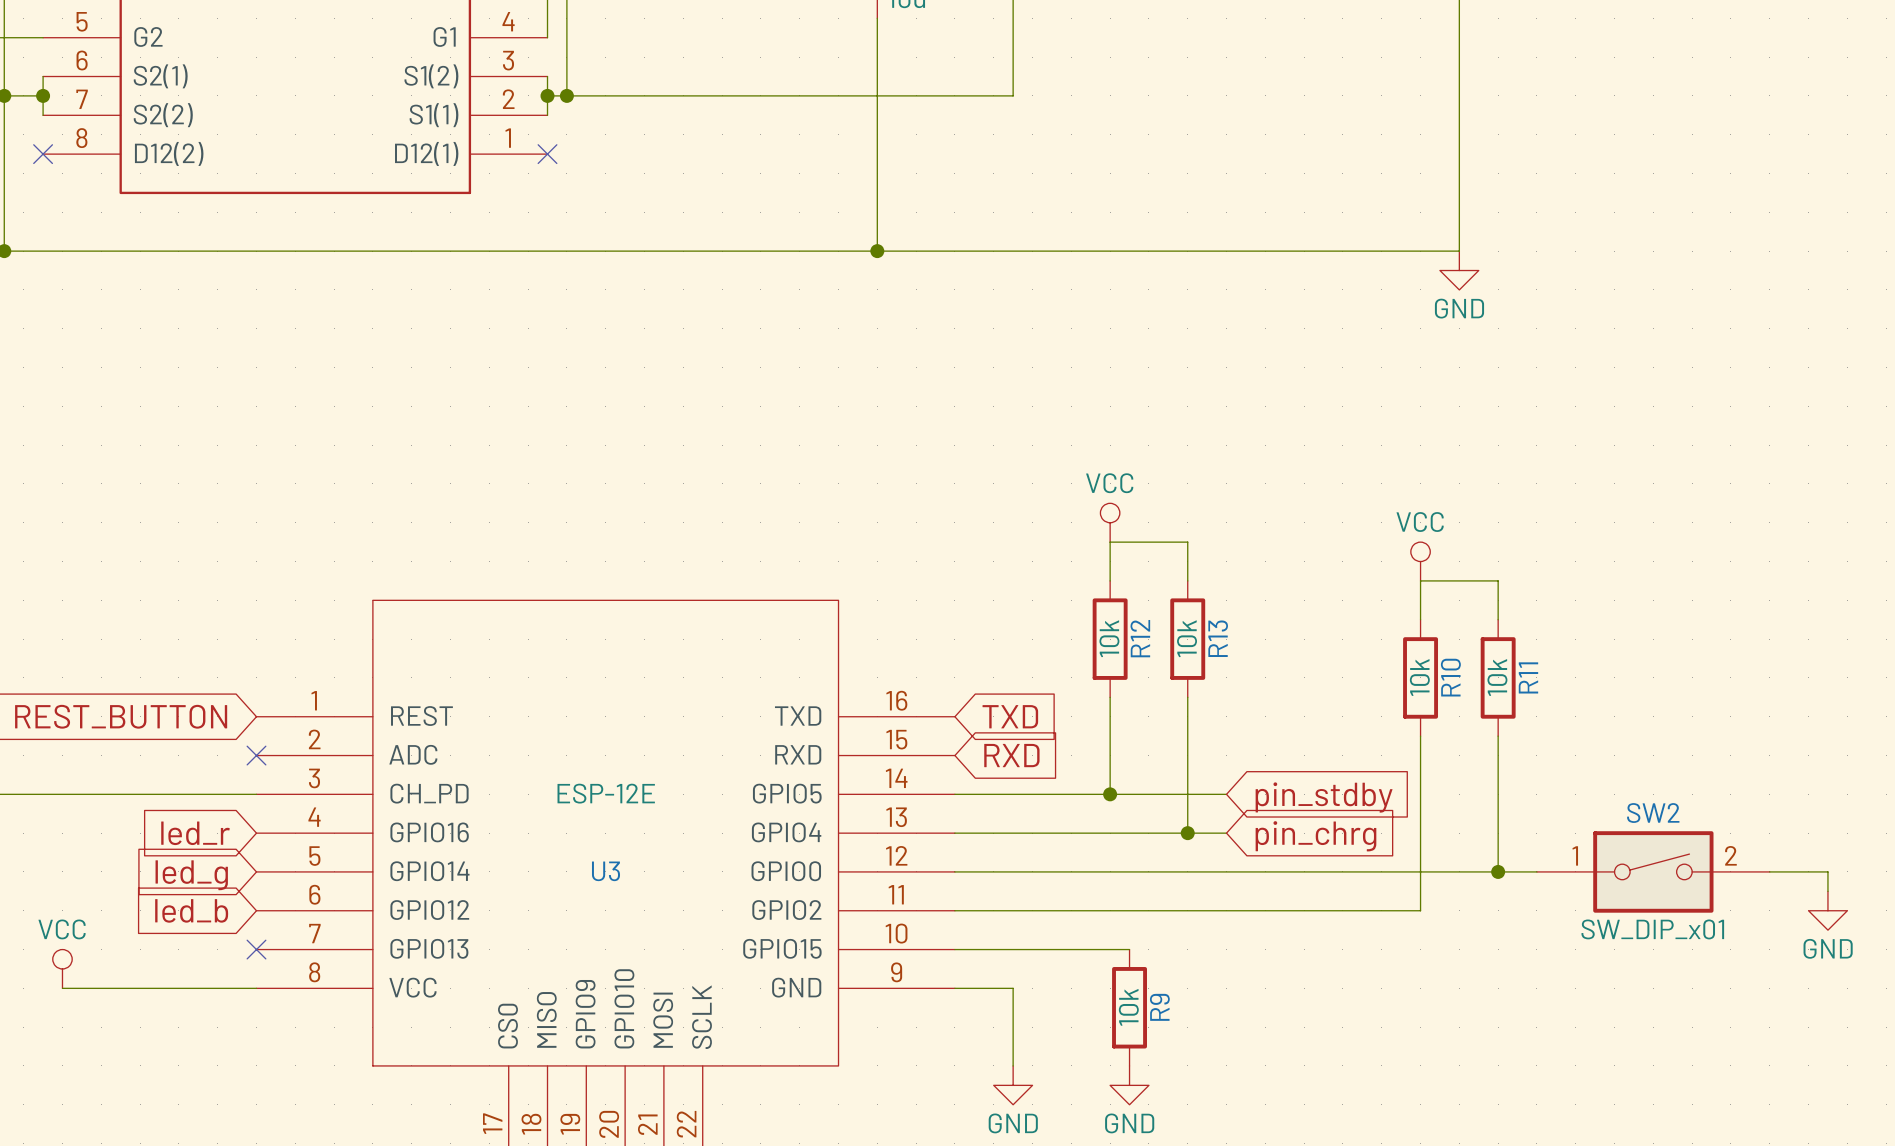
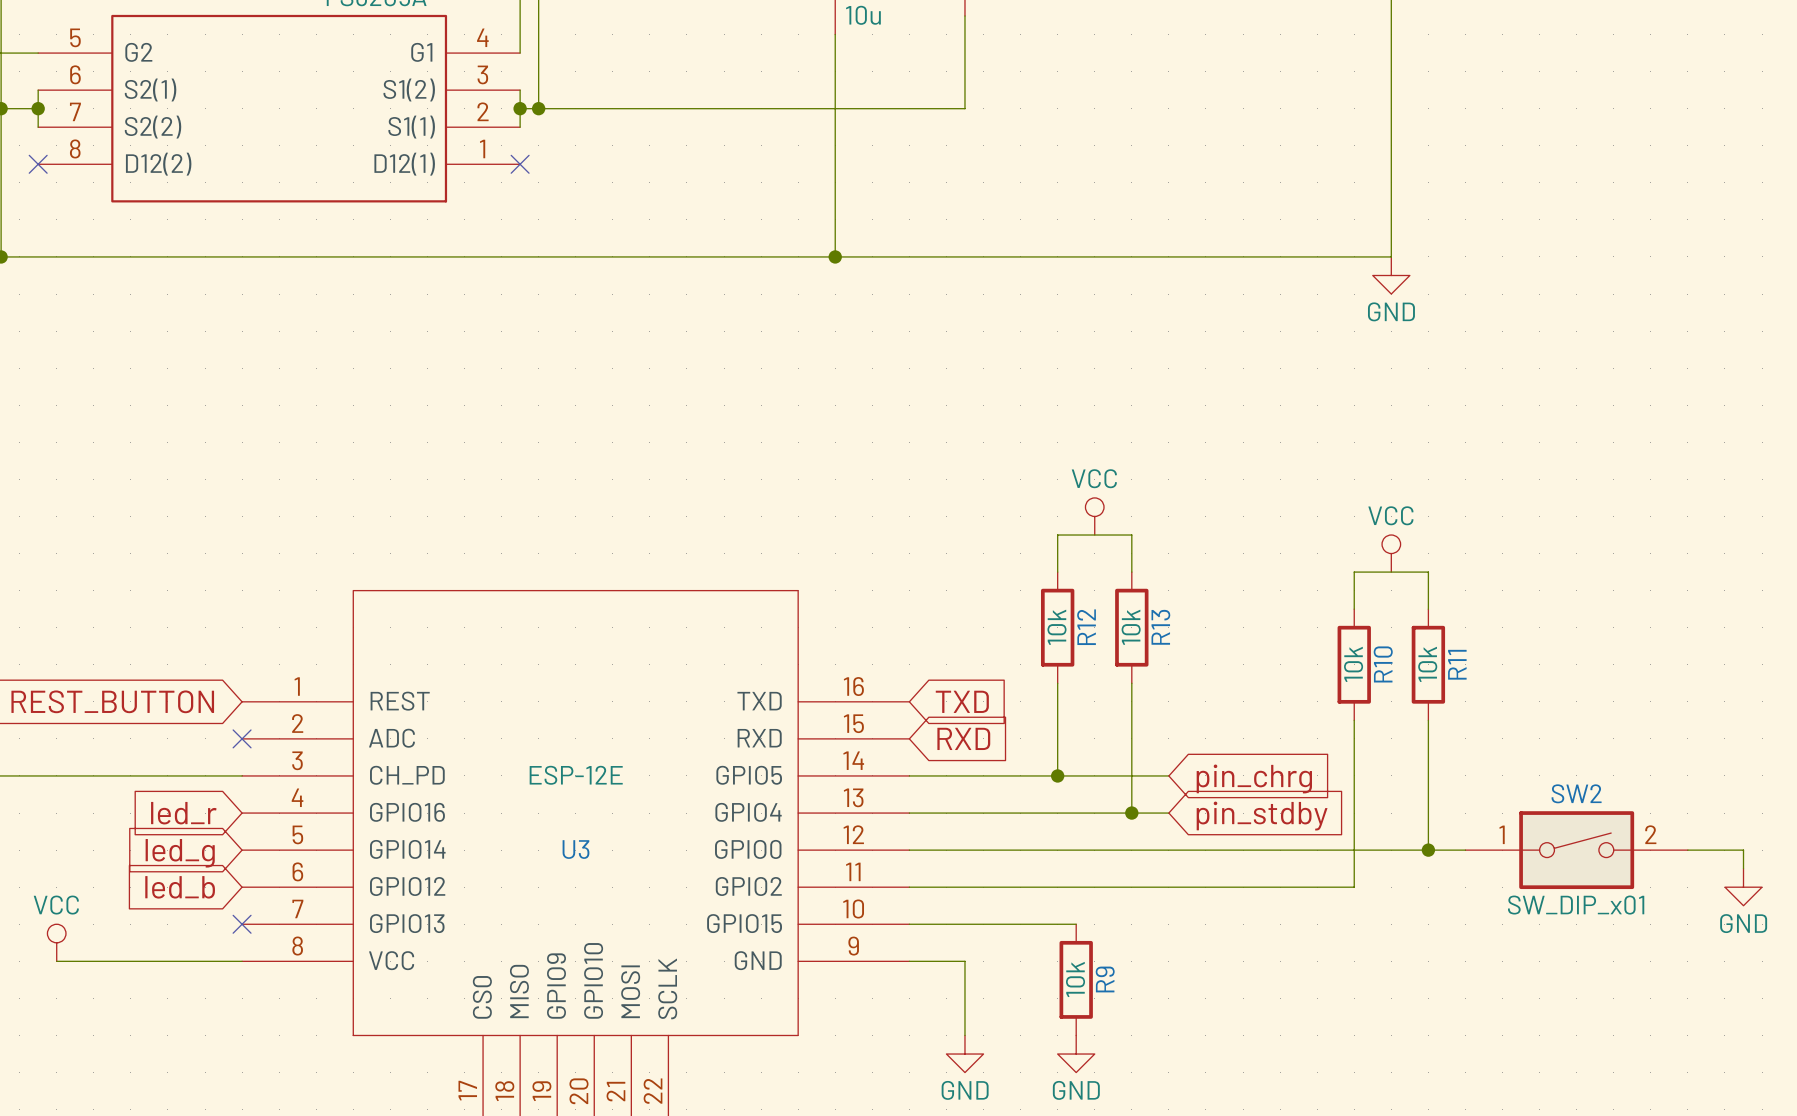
power symbol position: VCC (1110, 522) -> VCC (1094, 516)
power symbol position: VCC (1420, 561) -> VCC (1391, 553)
global label: pin_stdby (1324, 797) -> pin_chrg (1254, 778)
global label: pin_chrg (1315, 836) -> pin_stdby (1262, 816)

